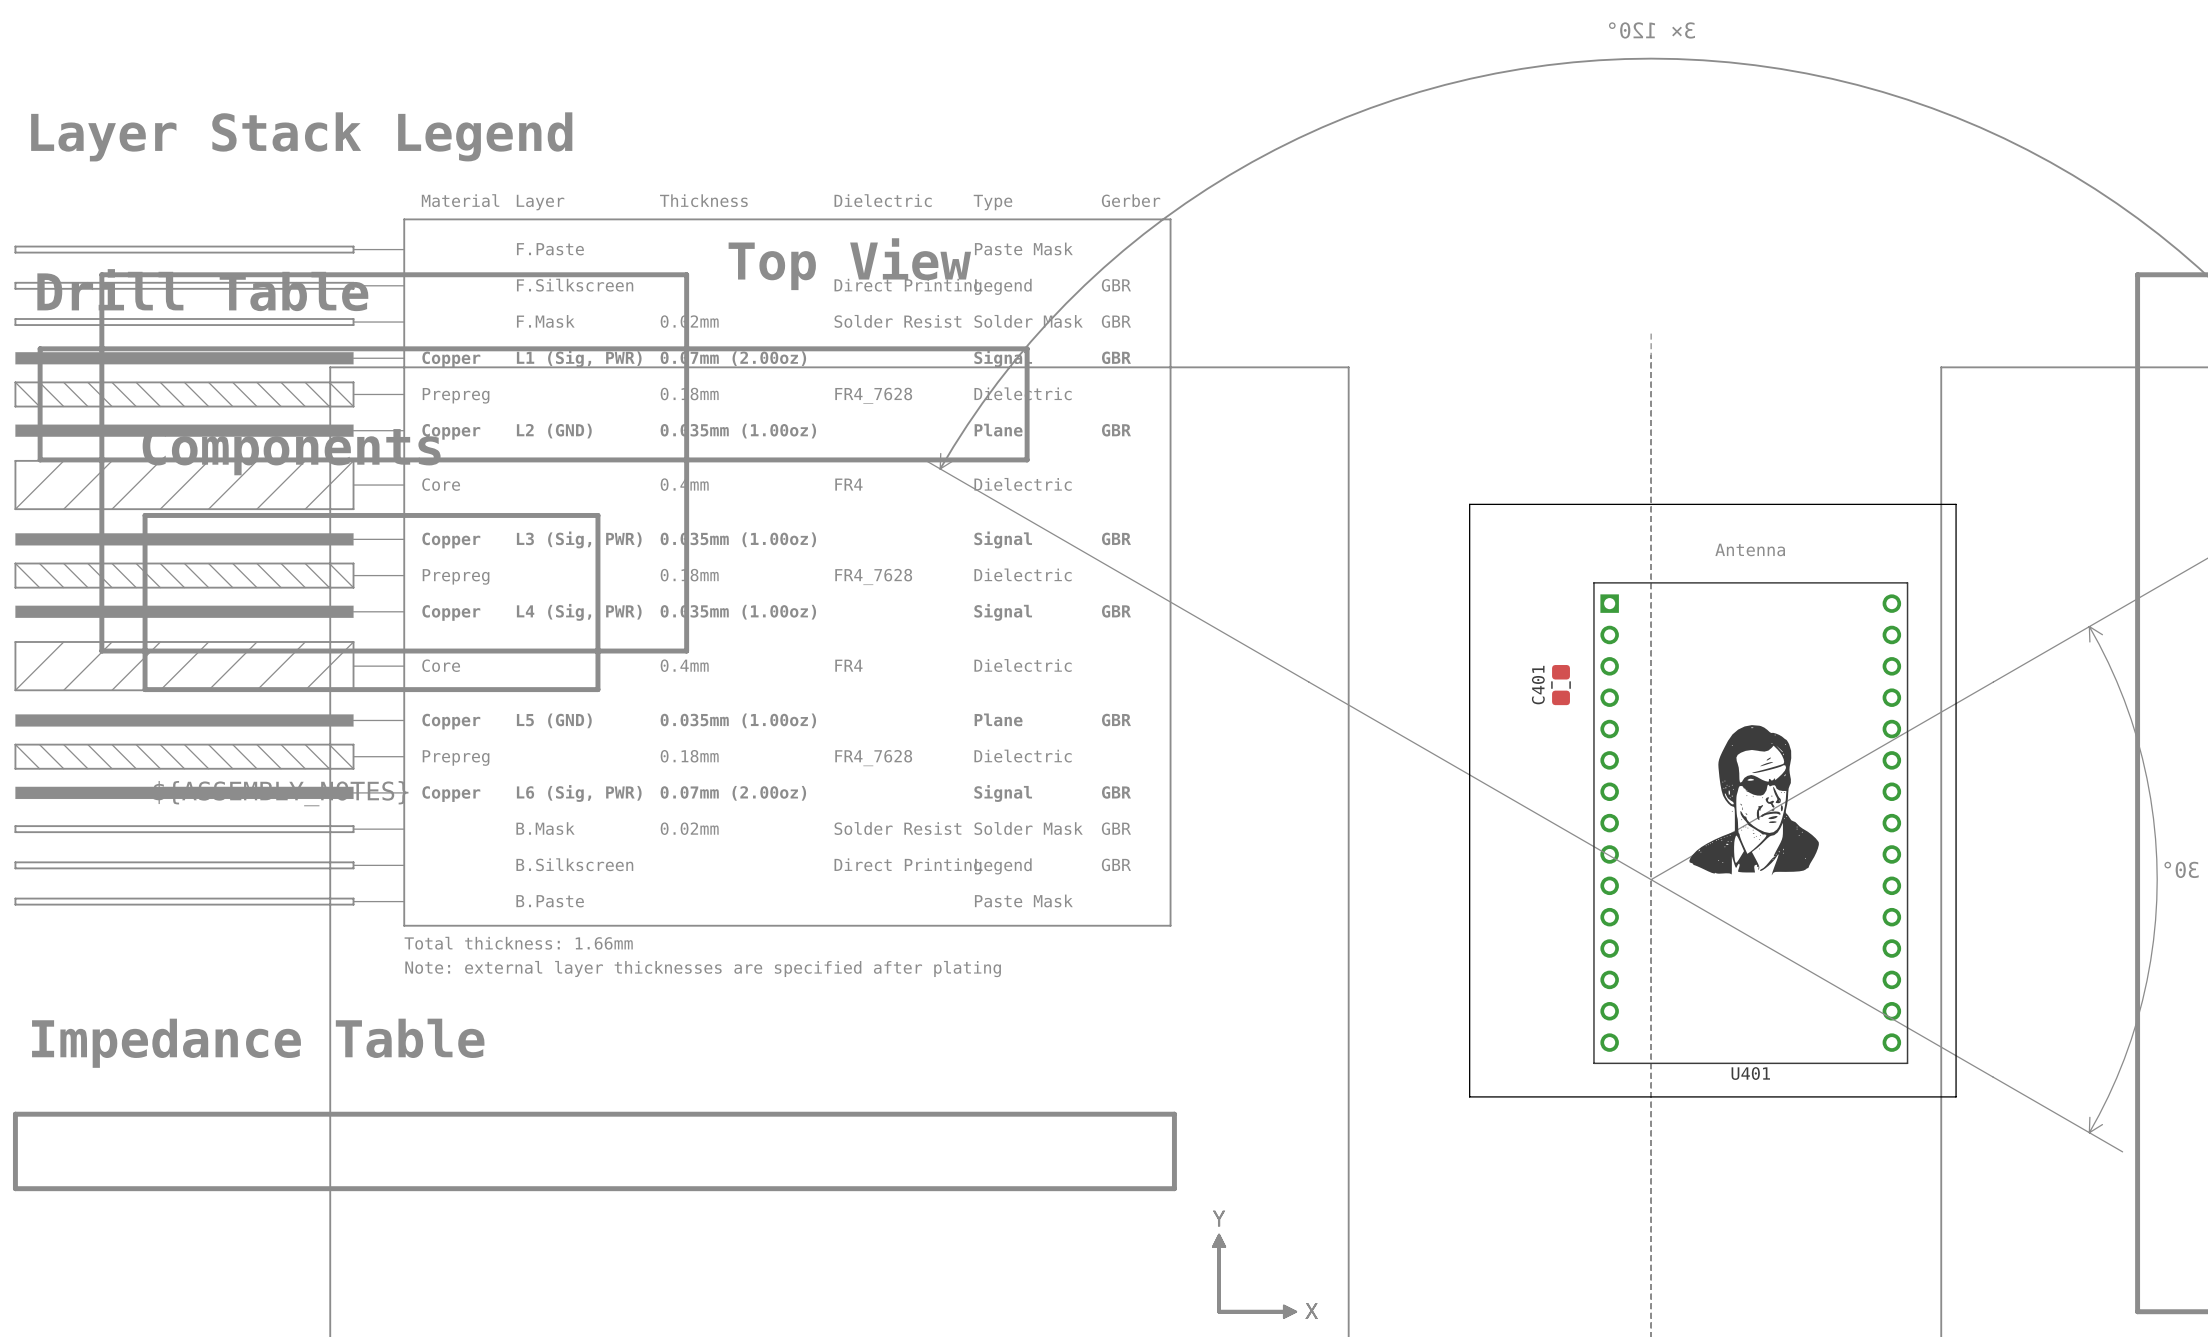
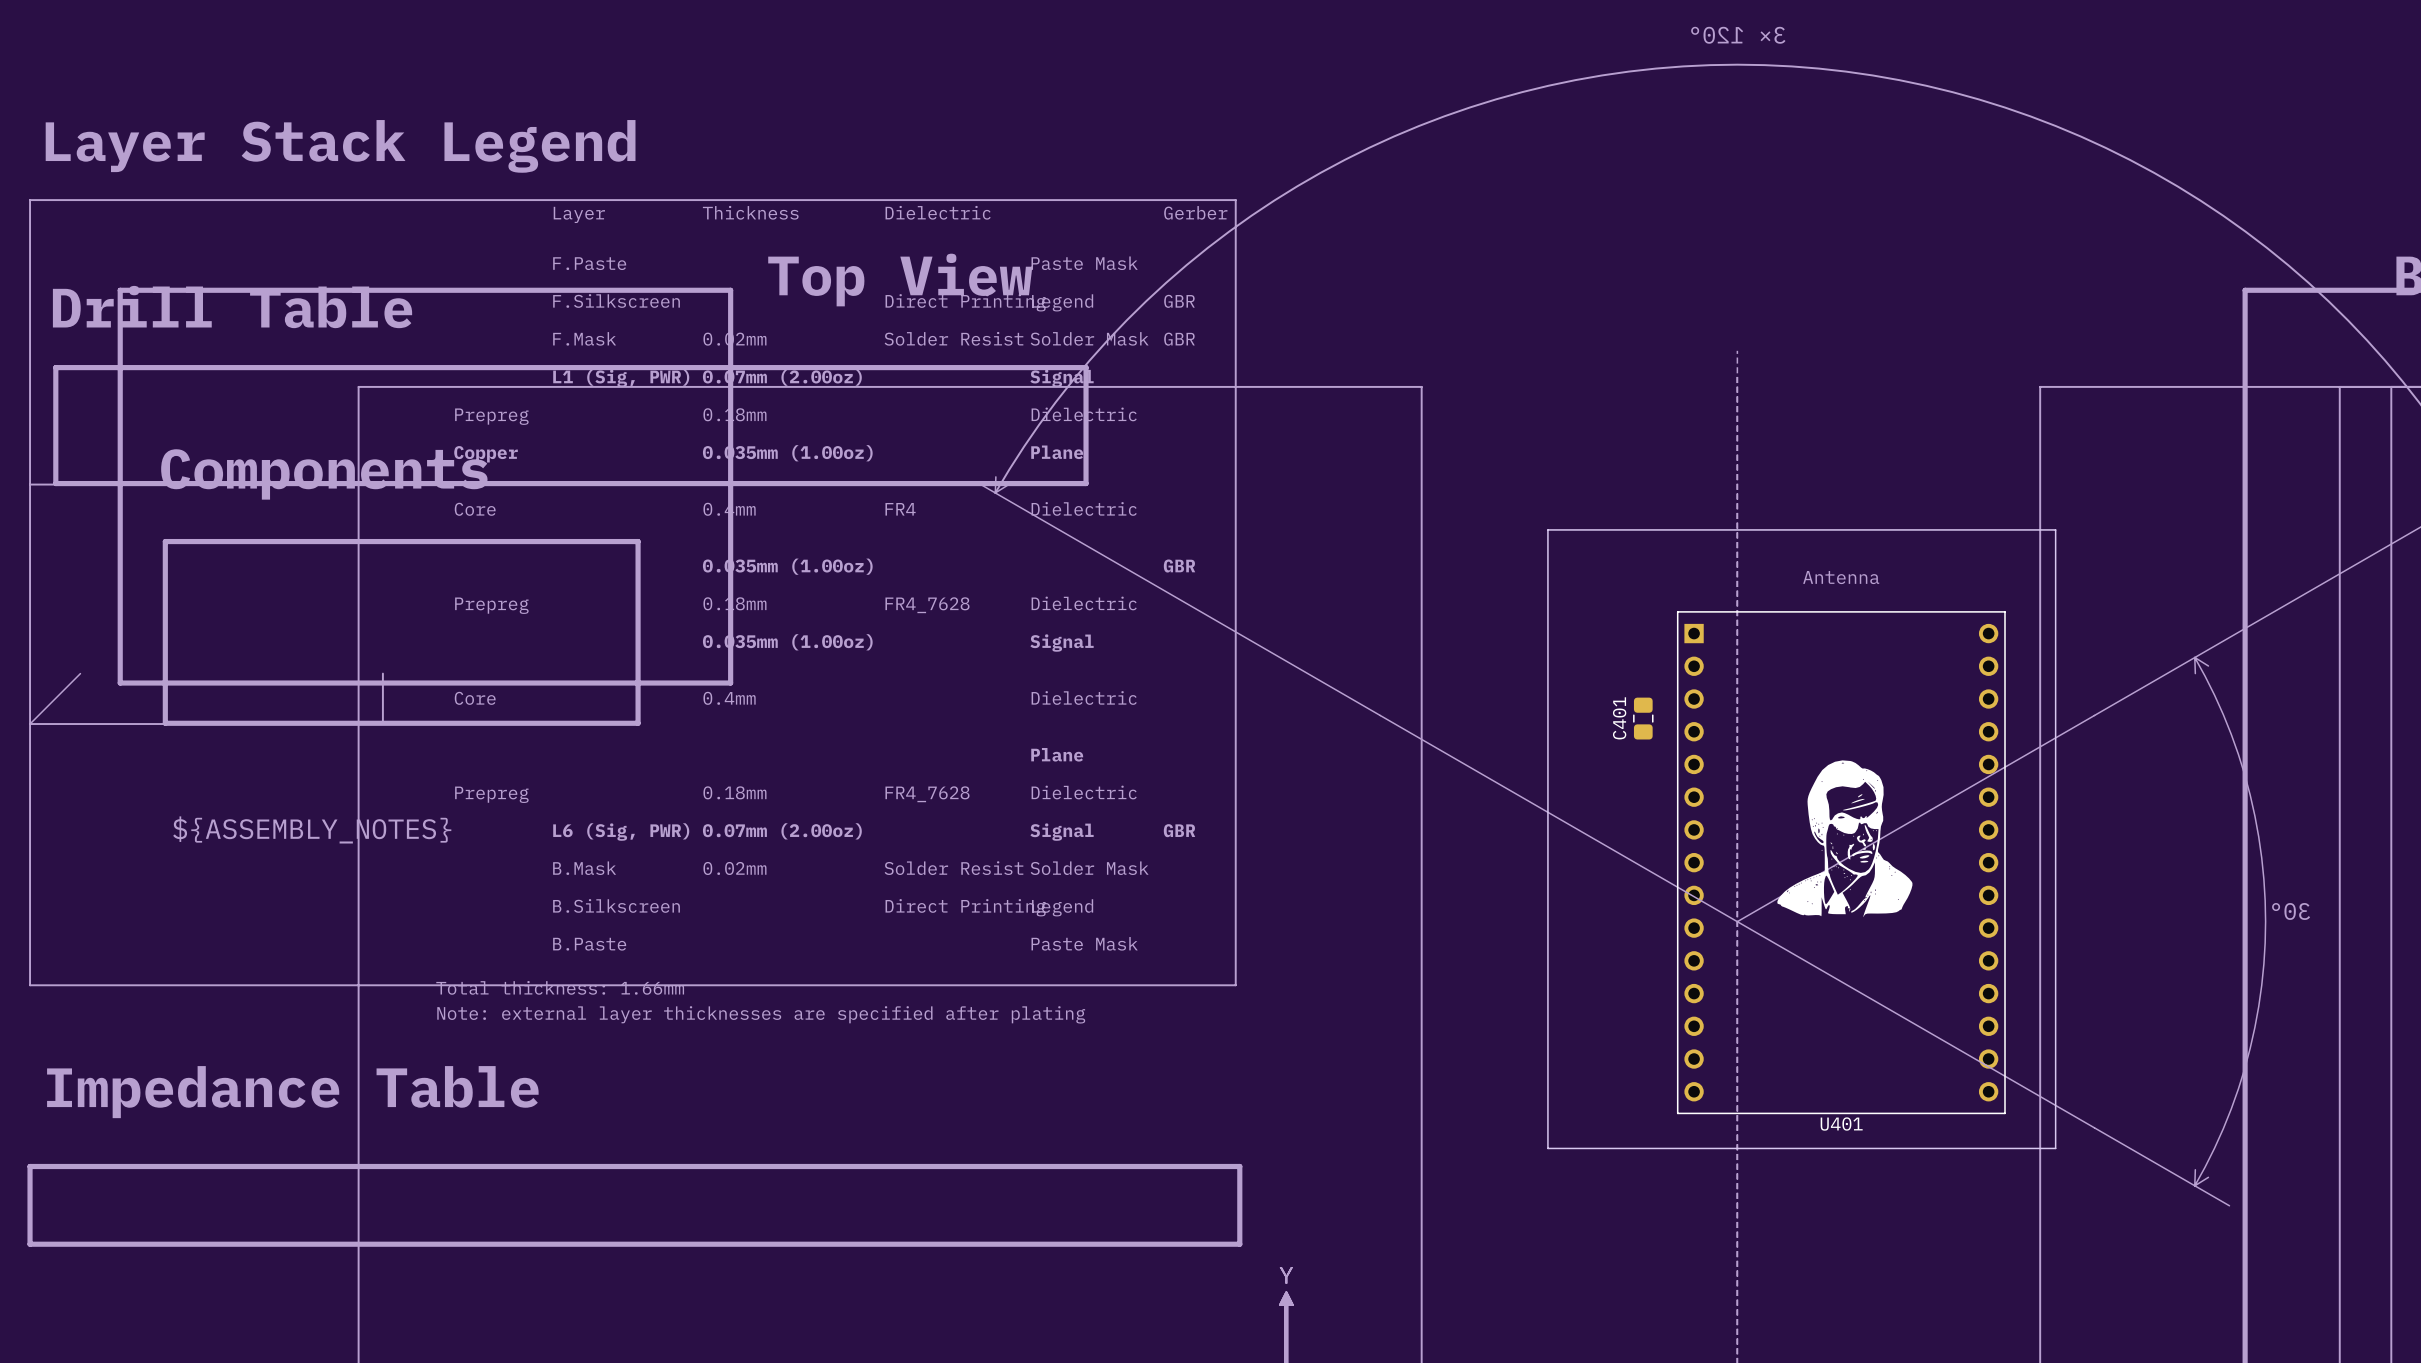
text: Material (460, 200) -> none
text: Type (992, 202) -> none
line: (1170, 219) (404, 219) (404, 925) (1170, 925) -> (1235, 232) (1235, 200) (30, 200) (30, 260)
line: (15, 246) (353, 246) (353, 252) (15, 252) -> (30, 298) (30, 267)
line: (353, 249) (404, 249) -> none
line: (15, 282) (353, 282) (353, 288) (15, 288) -> (30, 336) (30, 304)
line: (353, 285) (404, 285) -> none
line: (15, 319) (353, 319) (353, 325) (15, 325) -> (30, 402) (30, 342)
line: (353, 322) (404, 322) -> none
drawing: [15, 352, 354, 365] -> none
text: GBR (1116, 357) -> none
line: (353, 358) (404, 358) -> none
text: Copper (451, 359) -> none
line: (39, 382) (63, 406) -> none
line: (63, 382) (87, 406) -> none
line: (87, 382) (112, 406) -> none
line: (112, 382) (136, 406) -> none
line: (136, 382) (160, 406) -> none
line: (160, 382) (184, 406) -> none
line: (184, 382) (208, 406) -> none
line: (208, 382) (232, 406) -> none
line: (232, 382) (256, 406) -> none
line: (256, 382) (281, 406) -> none
line: (281, 382) (305, 406) -> none
line: (305, 382) (329, 406) -> none
line: (329, 382) (353, 406) -> none
line: (353, 394) (404, 394) -> none
text: FR4_7628 (873, 395) -> none
line: (15, 406) (353, 406) -> (30, 427) (30, 484)
line: (39, 406) (15, 382) (353, 382) (353, 406) -> none
drawing: [15, 424, 354, 437] -> none
line: (353, 430) (404, 430) -> none
text: GBR (1116, 430) -> none
text: L2 (GND) (554, 431) -> none
line: (63, 460) (15, 509) (353, 509) (353, 460) (305, 509) -> none
line: (112, 460) (63, 509) -> none
line: (160, 460) (112, 509) -> none
line: (208, 460) (160, 509) -> none
line: (256, 460) (208, 509) -> none
line: (305, 460) (256, 509) -> none
line: (353, 485) (404, 485) -> none
line: none -> (30, 534) (30, 591)
drawing: [15, 533, 354, 546] -> none
line: (353, 539) (404, 539) -> none
text: L3 (Sig, PWR) (579, 539) -> none
text: Signal (1003, 539) -> none
text: Copper (451, 540) -> none
line: (39, 563) (63, 587) -> none
line: (63, 563) (87, 587) -> none
line: (87, 563) (112, 587) -> none
line: (112, 563) (136, 587) -> none
line: (136, 563) (160, 587) -> none
line: (160, 563) (184, 587) -> none
line: (184, 563) (208, 587) -> none
line: (208, 563) (232, 587) -> none
line: (232, 563) (256, 587) -> none
line: (256, 563) (281, 587) -> none
line: (281, 563) (305, 587) -> none
line: (305, 563) (329, 587) -> none
line: (329, 563) (353, 587) -> none
line: (353, 575) (404, 575) -> none
line: (15, 587) (353, 587) -> none
line: (39, 587) (15, 563) (353, 563) (353, 587) -> none
drawing: [15, 605, 354, 618] -> none
line: (353, 611) (404, 611) -> none
text: GBR (1116, 611) -> none
text: Copper (451, 612) -> none
text: L4 (Sig, PWR) (579, 612) -> none
line: (15, 641) (353, 641) (305, 690) -> (30, 673) (30, 616)
line: (112, 641) (63, 690) -> none
line: (160, 641) (112, 690) -> none
line: (208, 641) (160, 690) -> none
line: (256, 641) (208, 690) -> none
line: (305, 641) (256, 690) -> none
text: FR4 (848, 665) -> none
line: (353, 666) (404, 666) -> none
line: none -> (30, 724) (30, 780)
drawing: [15, 714, 354, 727] -> none
line: (353, 720) (404, 720) -> none
text: L5 (GND) (554, 720) -> none
text: 0.035mm (1.00oz) (738, 720) -> none
text: GBR (1116, 720) -> none
text: Copper (451, 721) -> none
line: (39, 744) (63, 768) -> none
line: (63, 744) (87, 768) -> none
line: (87, 744) (112, 768) -> none
line: (112, 744) (136, 768) -> none
line: (136, 744) (160, 768) -> none
line: (160, 744) (184, 768) -> none
line: (184, 744) (208, 768) -> none
line: (208, 744) (232, 768) -> none
line: (232, 744) (256, 768) -> none
line: (256, 744) (281, 768) -> none
line: (281, 744) (305, 768) -> none
line: (305, 744) (329, 768) -> none
line: (329, 744) (353, 768) -> none
line: (353, 756) (404, 756) -> none
line: (15, 768) (353, 768) -> (30, 805) (30, 865)
line: (39, 768) (15, 744) (353, 744) (353, 768) -> none
drawing: [15, 786, 354, 800] -> none
line: (353, 792) (404, 792) -> none
text: Copper (451, 794) -> none
line: (15, 826) (353, 826) (353, 832) (15, 832) -> (30, 903) (30, 872)
text: GBR (1116, 828) -> none
line: (353, 829) (404, 829) -> none
line: (15, 862) (353, 862) (353, 868) (15, 868) -> (30, 941) (30, 909)
text: GBR (1116, 864) -> none
line: (353, 865) (404, 865) -> none
line: (15, 898) (353, 898) (353, 904) (15, 904) -> (1235, 969) (1235, 985) (30, 985) (30, 947)
line: (353, 901) (404, 901) -> none

